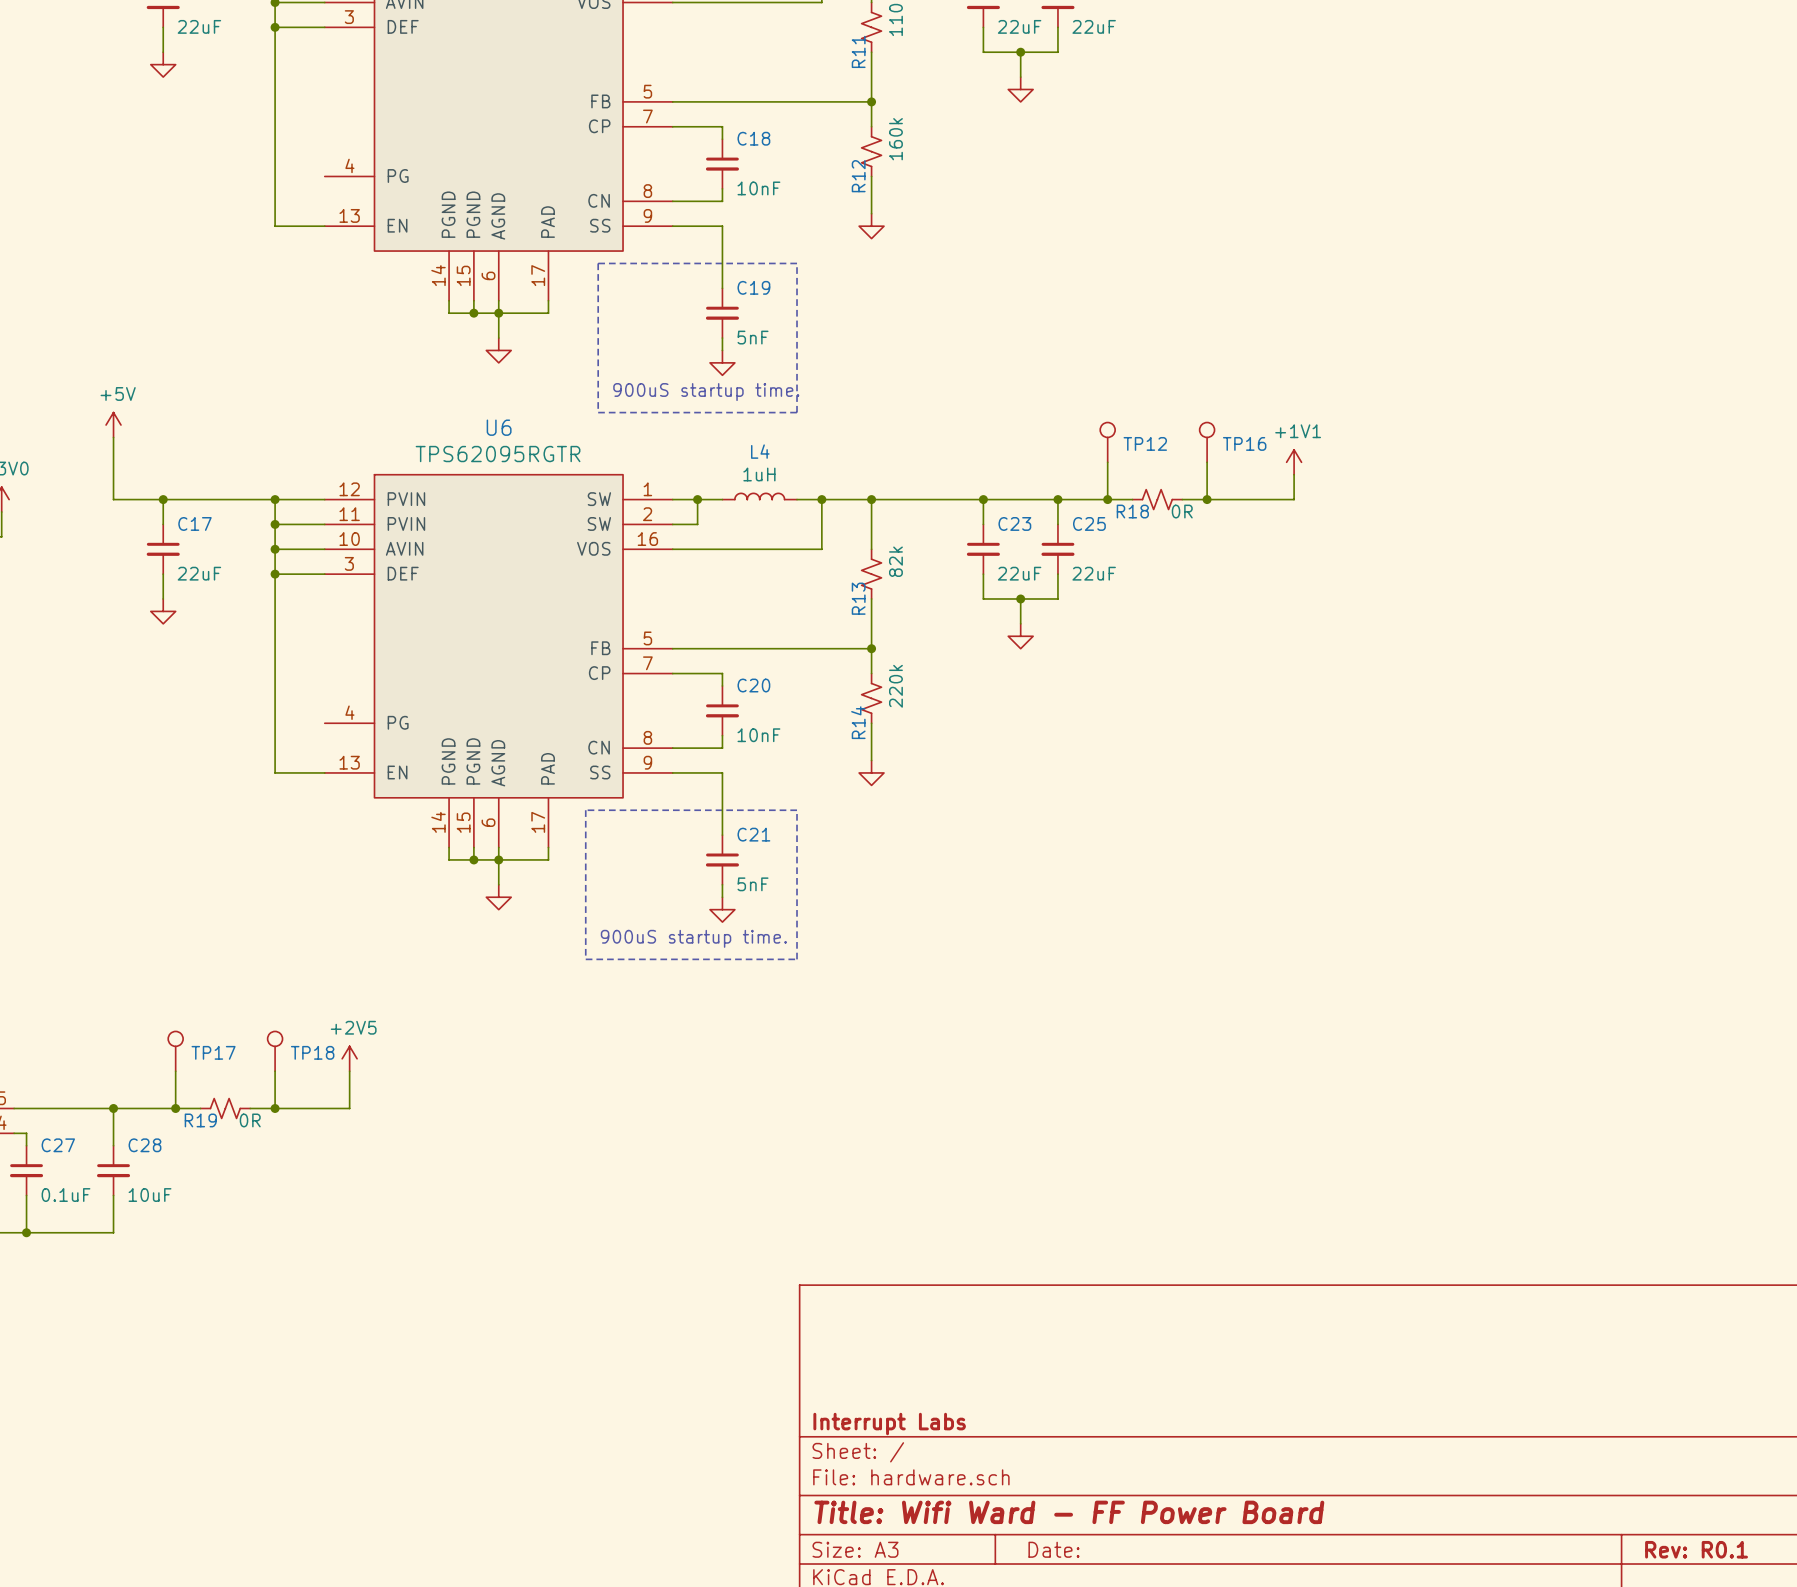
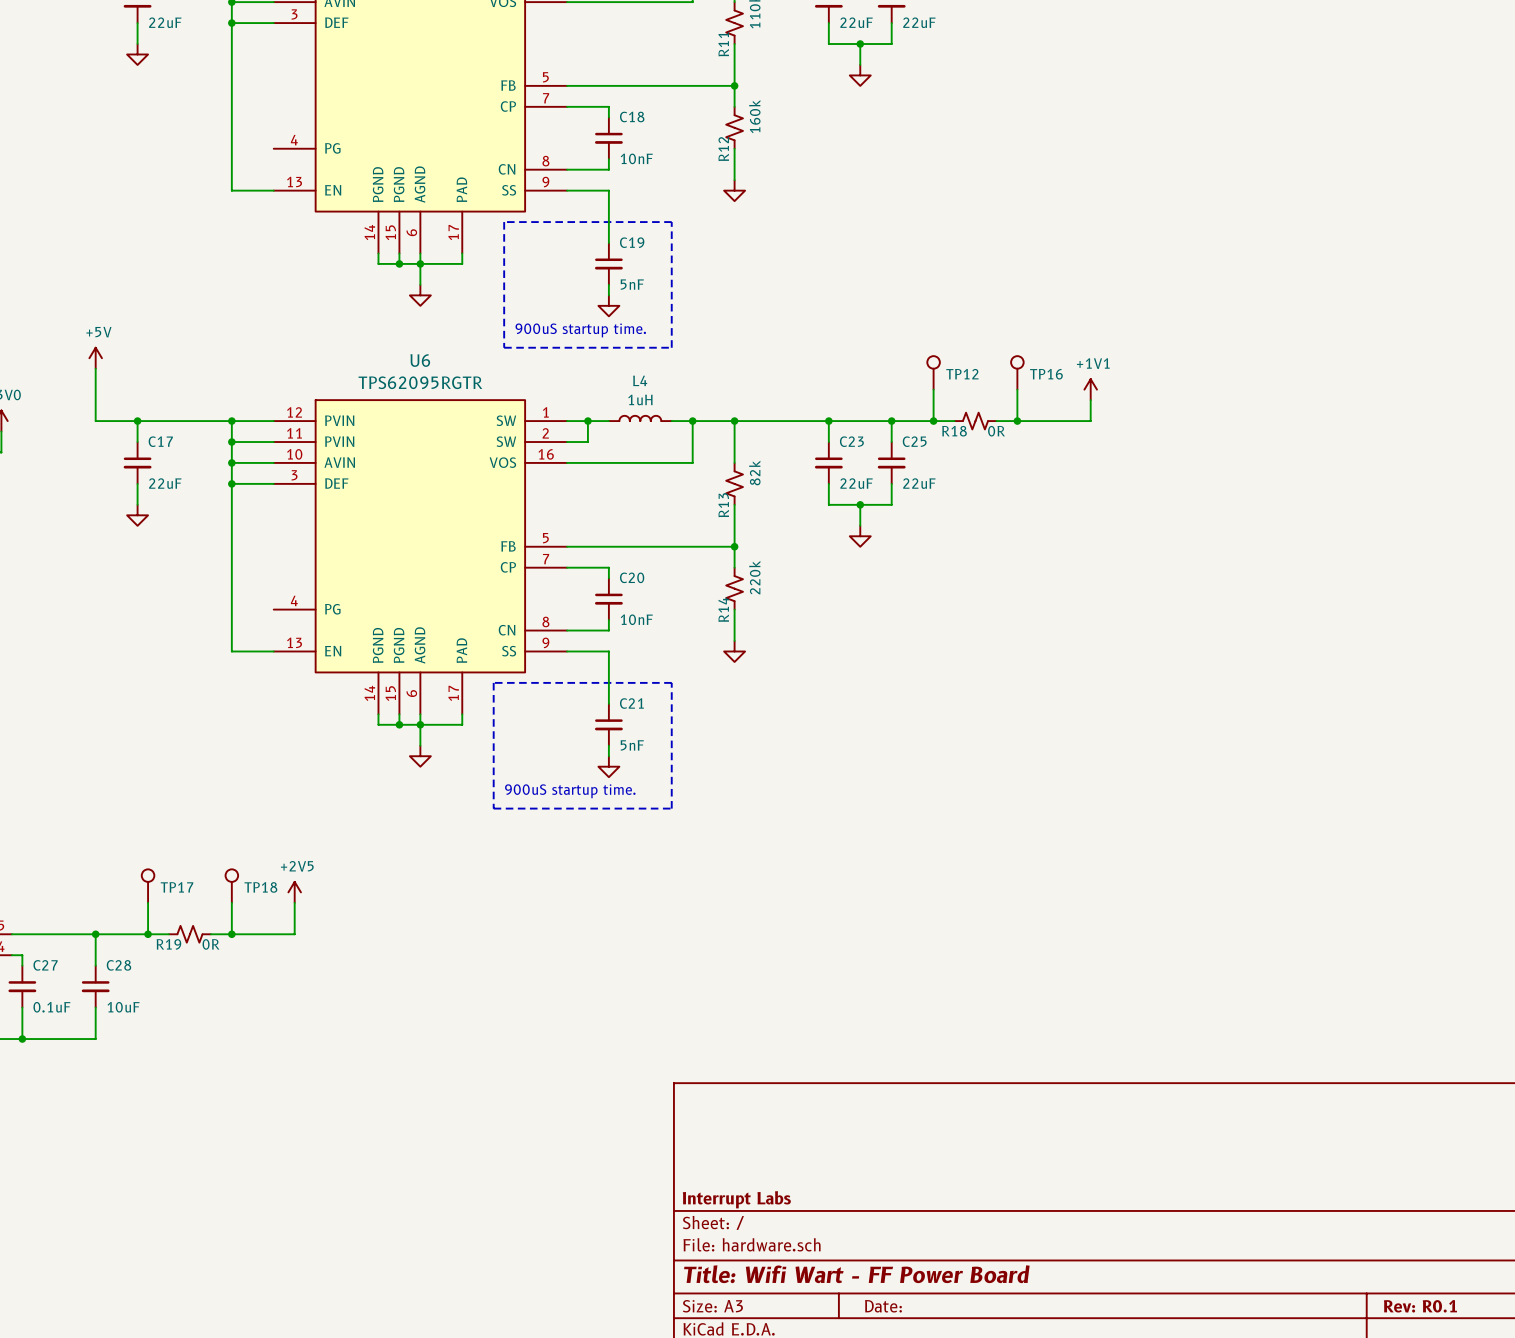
title block: Title: Wifi Ward - FF Power Board (1069, 1512) -> Title: Wifi Wart - FF Power Board (856, 1274)

